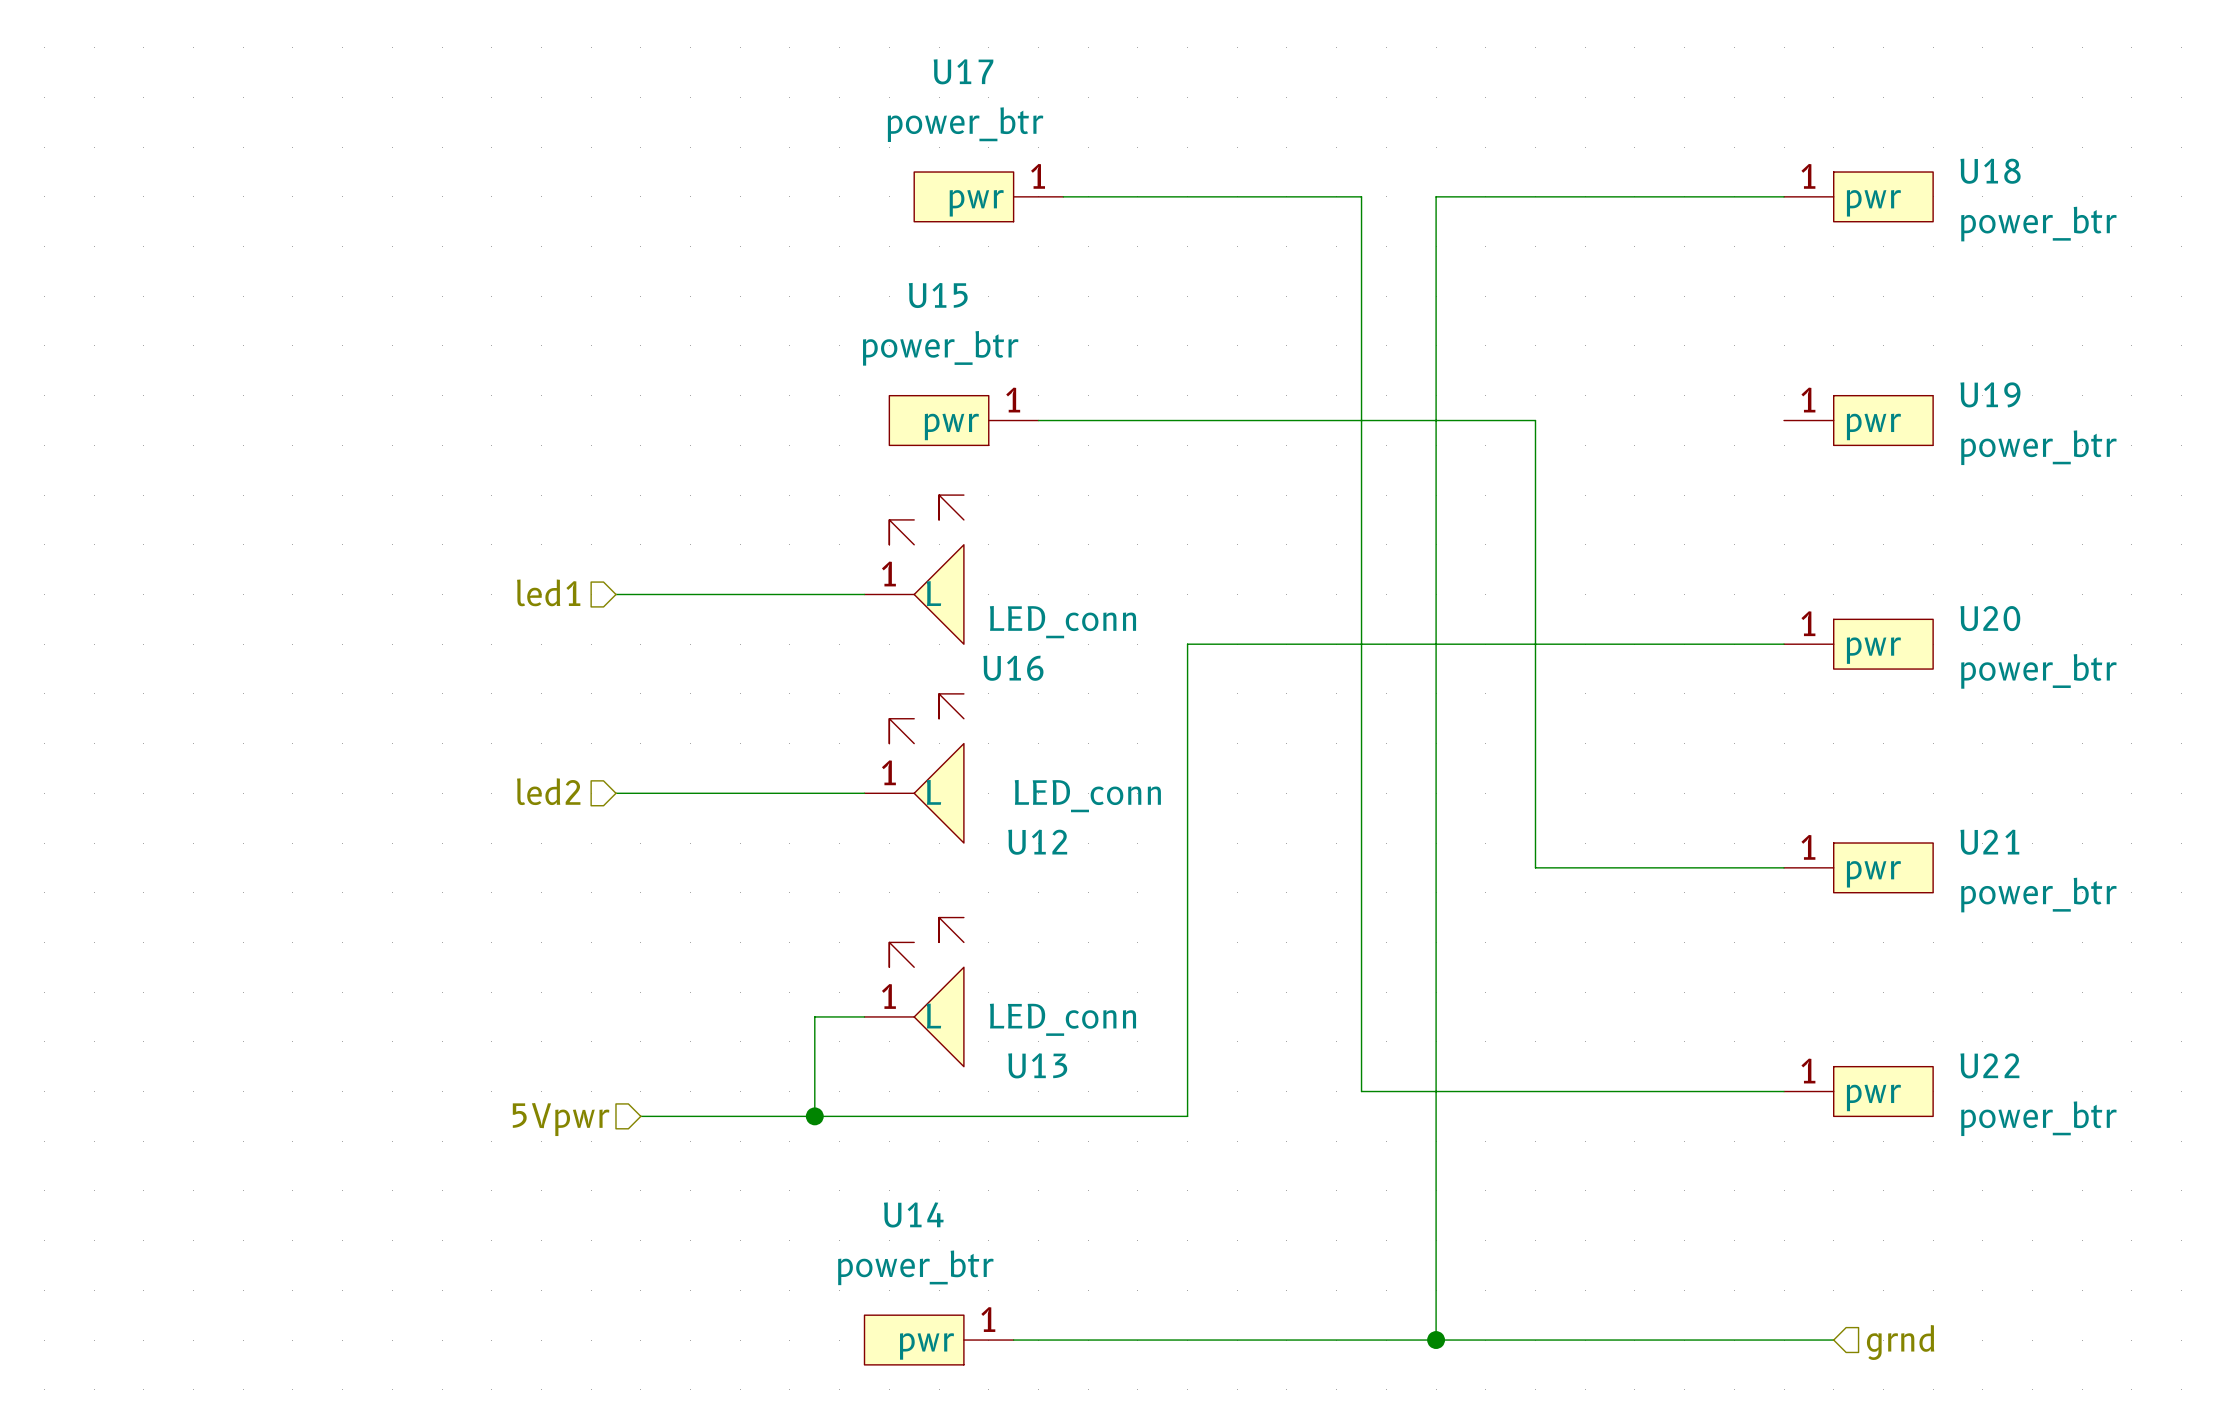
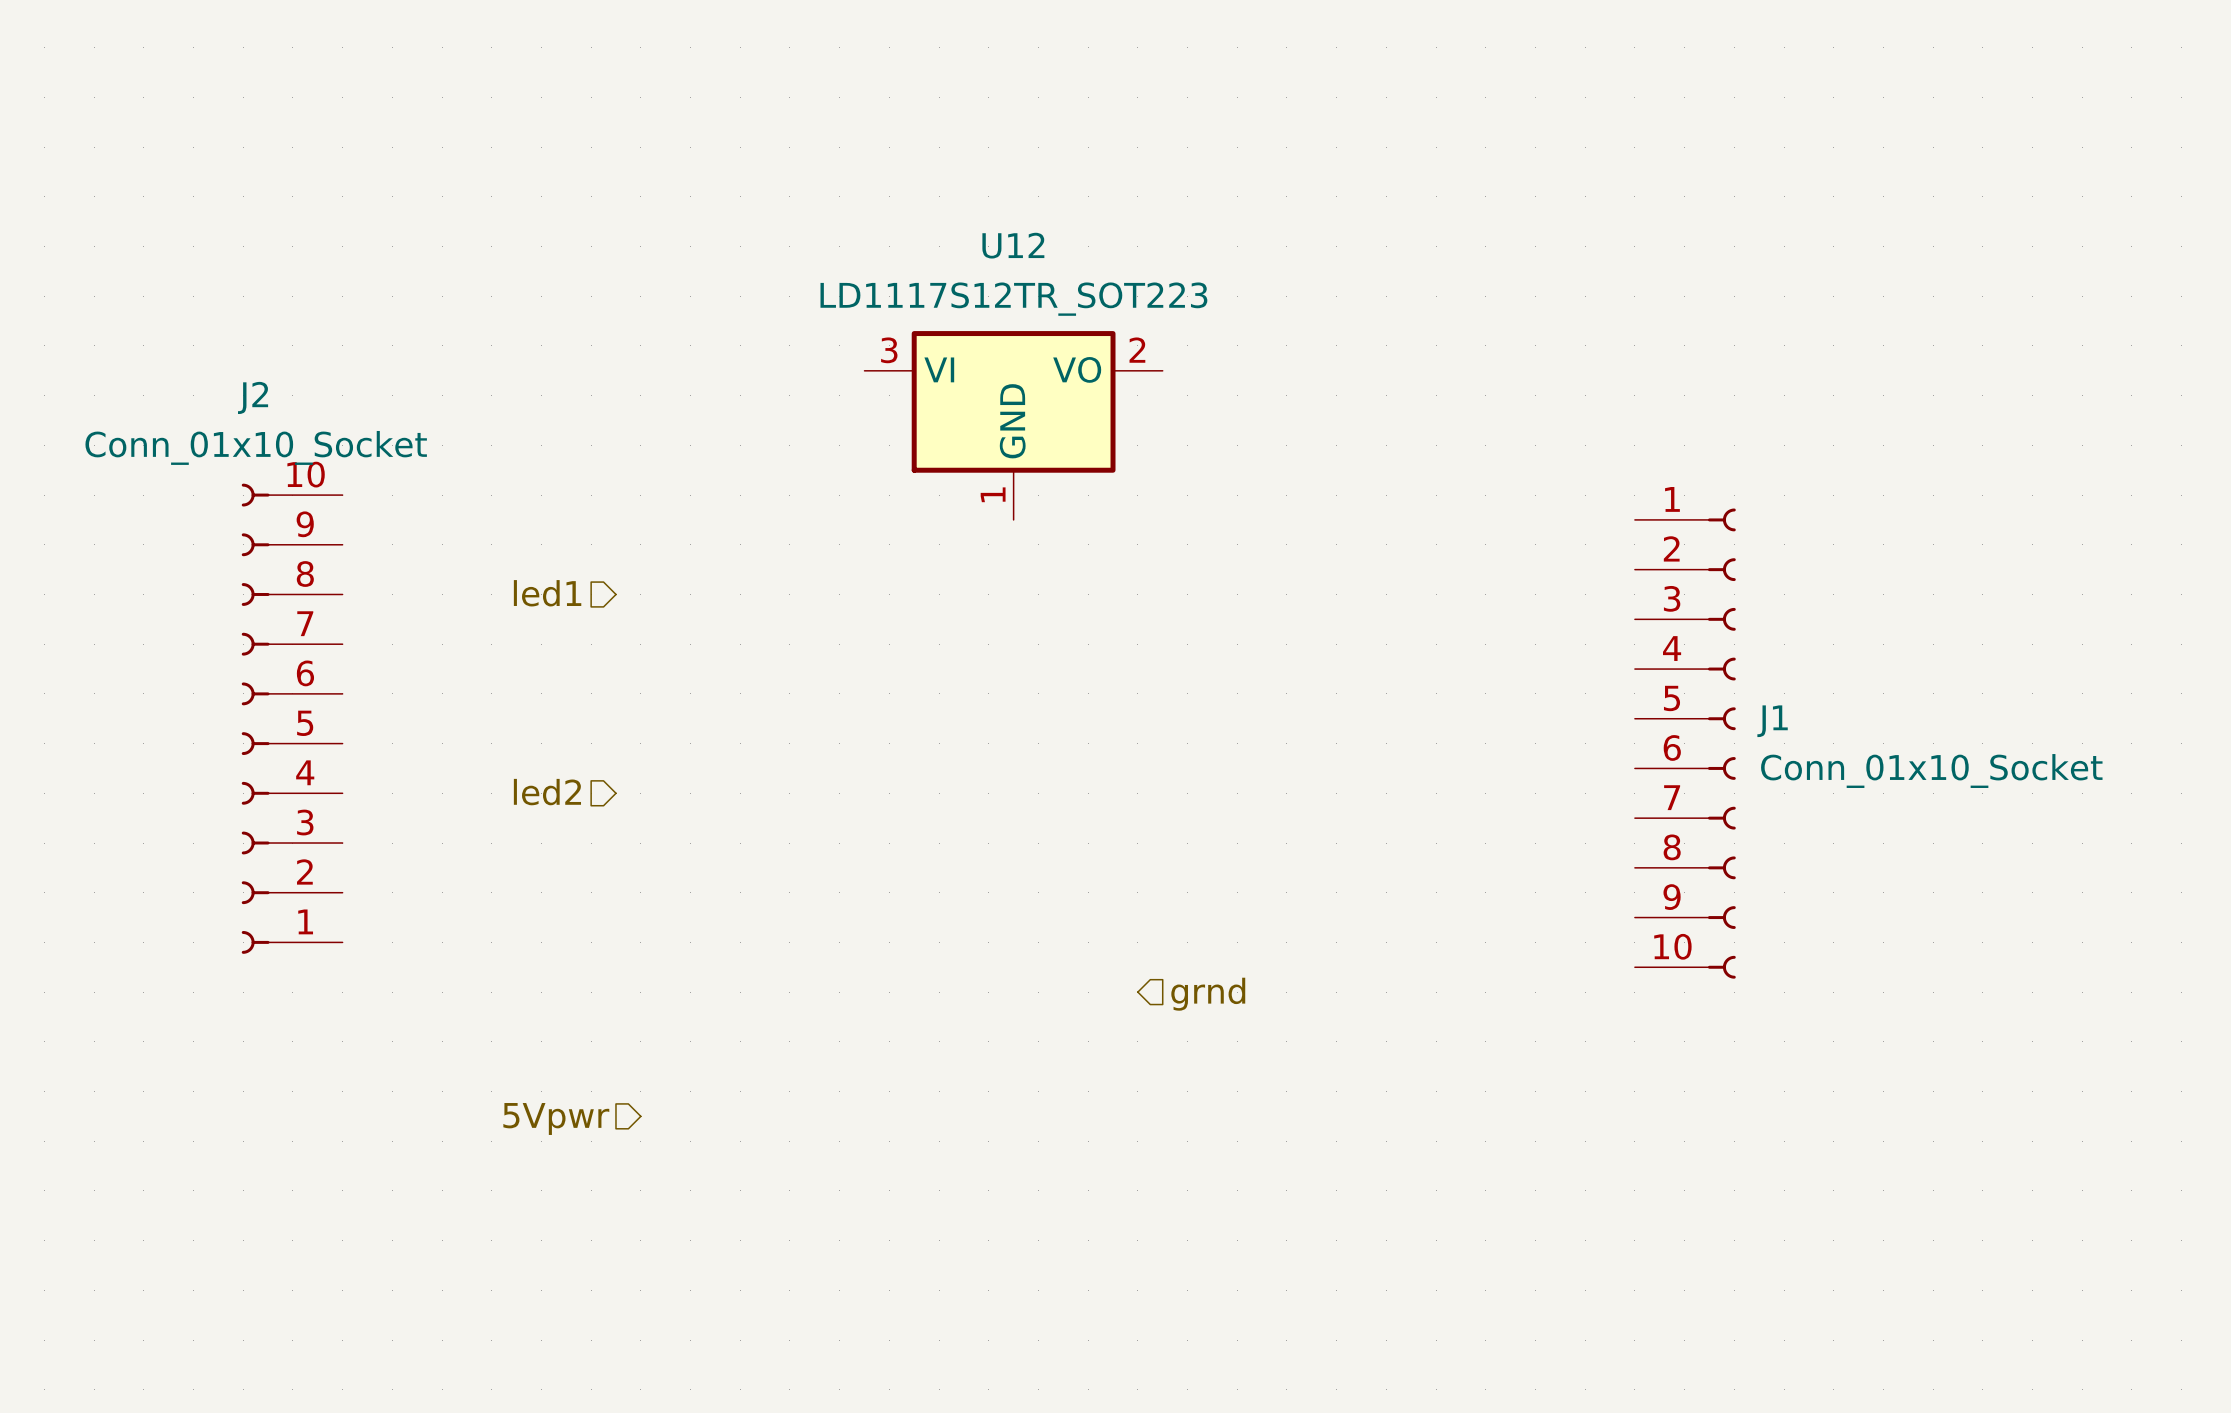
U17: power_btr (988, 196) -> none
wire: (1063, 196) (1361, 196) (1361, 1091) (1784, 1091) -> none
wire: (1784, 196) (1436, 196) (1436, 1340) -> none
U18: power_btr (1858, 196) -> none
U15: power_btr (963, 420) -> none
wire: (1038, 420) (1535, 420) (1535, 867) (1784, 867) -> none
U19: power_btr (1858, 420) -> none
U16: LED_conn (914, 569) -> none
wire: (615, 594) (864, 594) -> none
wire: (1784, 644) (1187, 644) (1187, 1116) (640, 1116) -> none
U20: power_btr (1858, 644) -> none
U12 symbol: [864, 693, 964, 844] -> [864, 331, 1163, 520]
J2: none -> Conn_01x10_Socket (292, 718)
J1: none -> Conn_01x10_Socket (1685, 743)
wire: (615, 793) (864, 793) -> none
U12 value: LED_conn (1087, 796) -> LD1117S12TR_SOT223 (1013, 299)
U12 name position: U12 (1037, 842) -> U12 (1013, 245)
U21: power_btr (1858, 867) -> none
U13: LED_conn (914, 992) -> none
hierarchical label: none -> grnd (1208, 994)
wire: (864, 1016) (814, 1016) (814, 1116) -> none
U22: power_btr (1858, 1091) -> none
junction: (814, 1116) -> none
U14: power_btr (939, 1340) -> none
wire: (1013, 1340) (1833, 1340) -> none
junction: (1436, 1340) -> none
hierarchical label: grnd (1900, 1342) -> none

